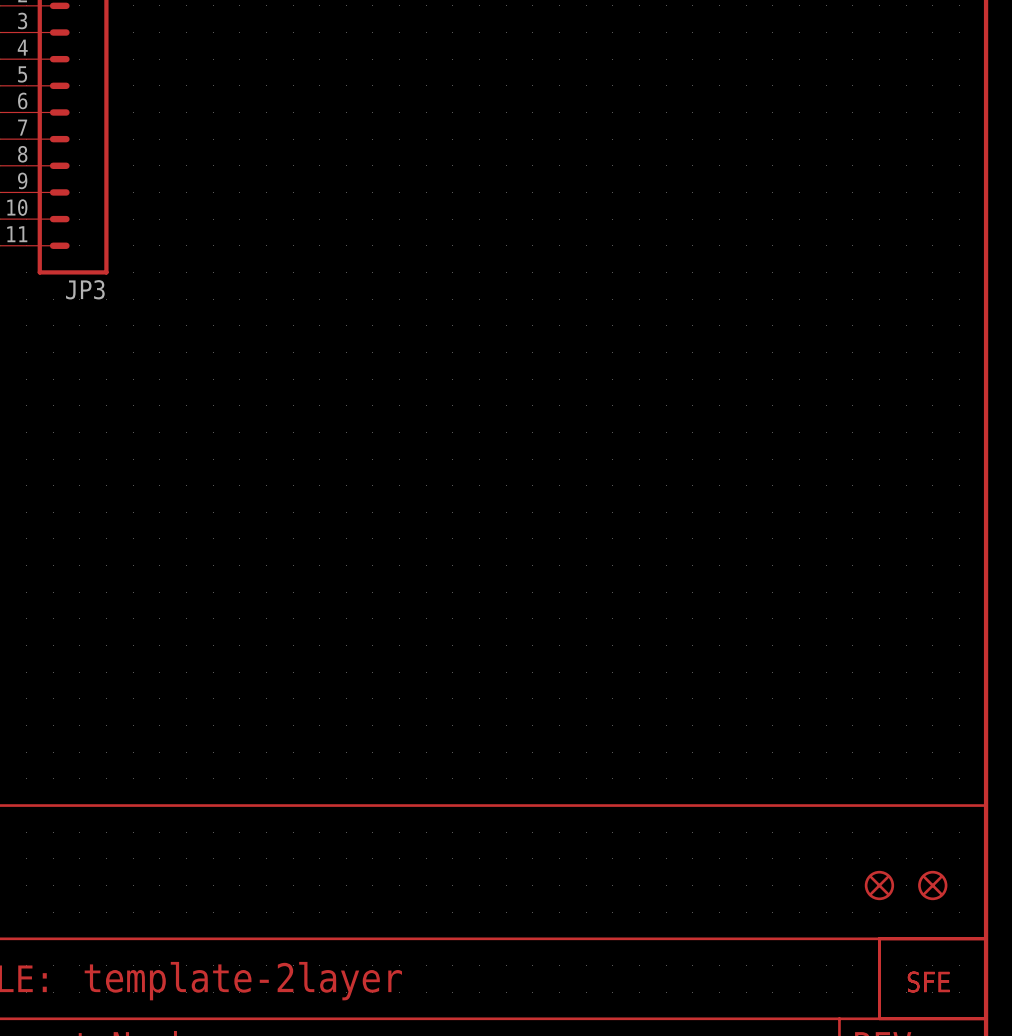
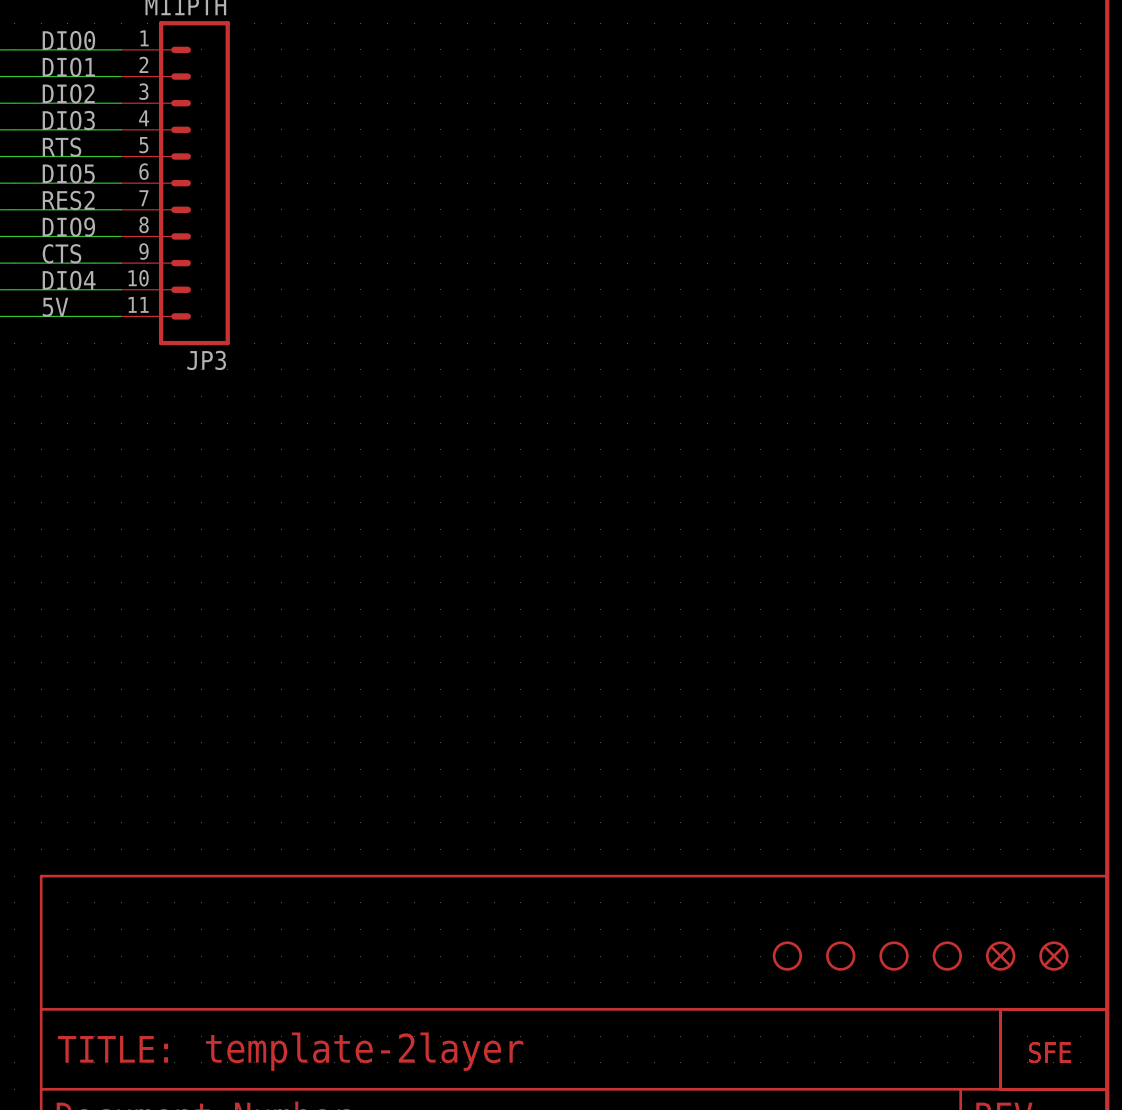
part: none -> (787, 956)
part: none -> (840, 956)
part: none -> (894, 956)
part: none -> (947, 956)

